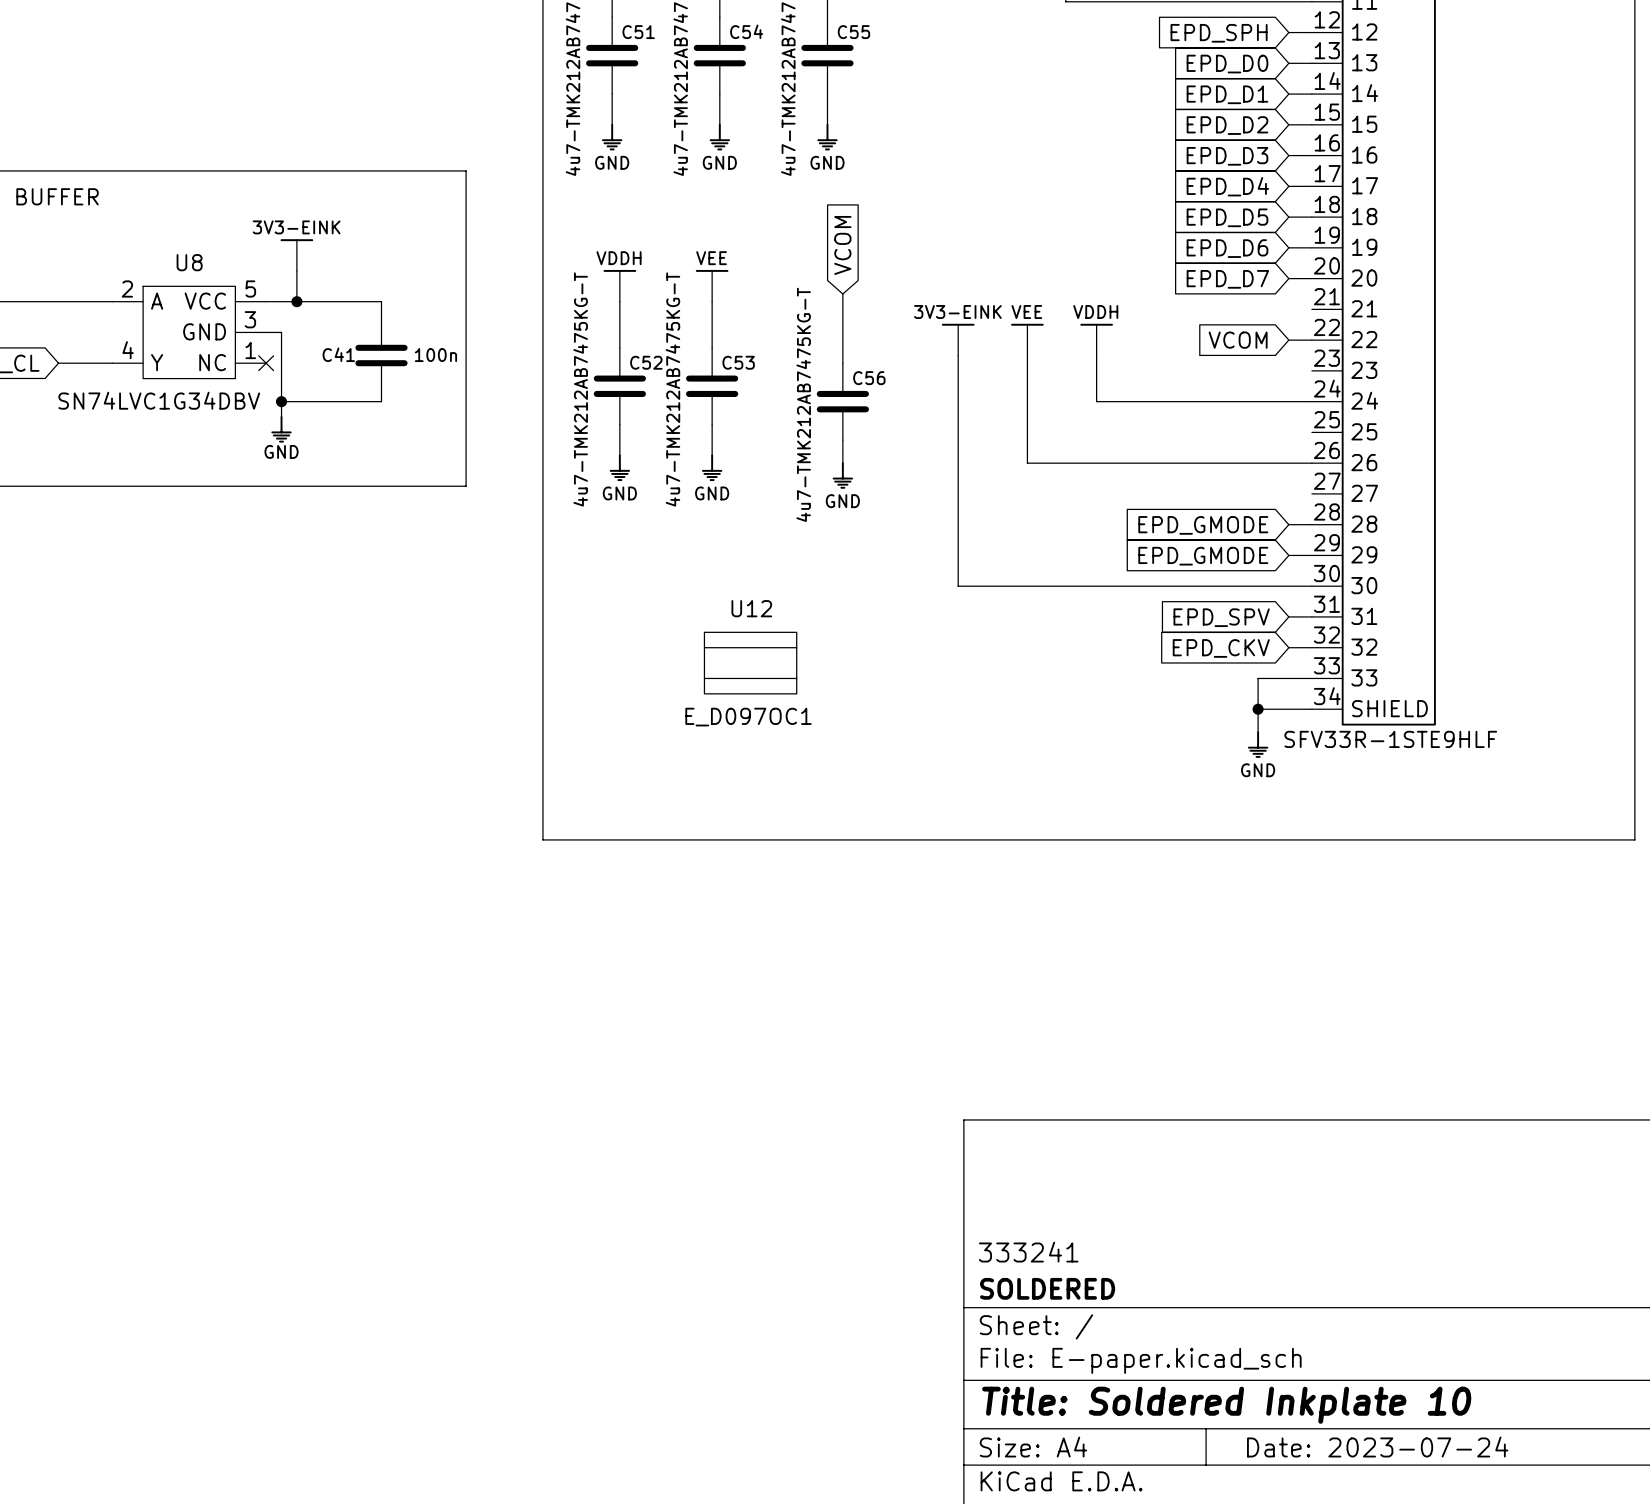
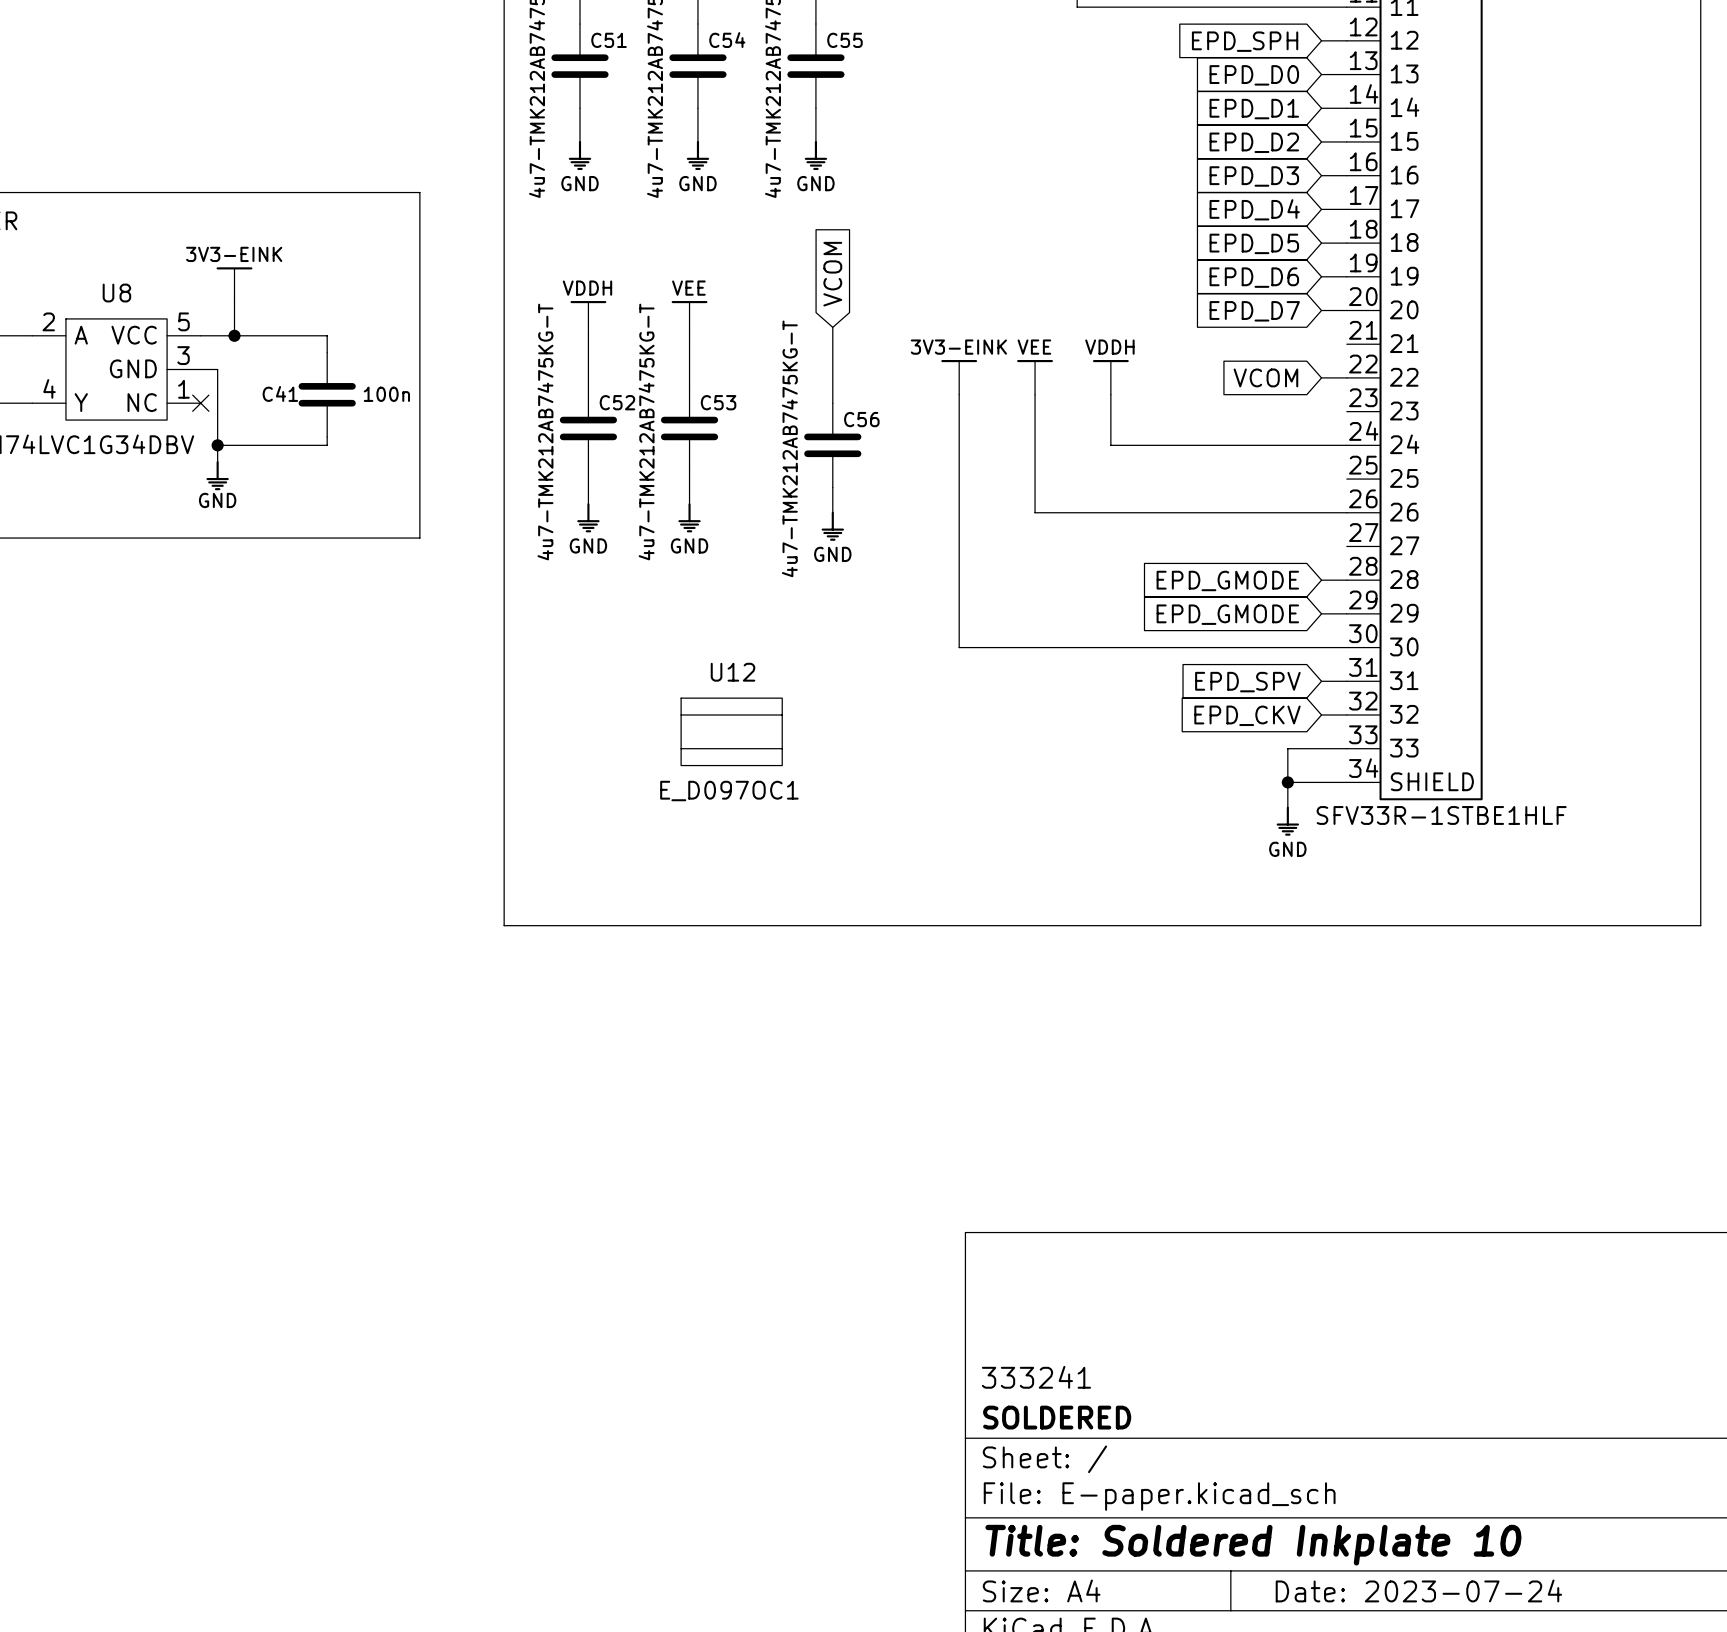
part value: SFV33R-1STE9HLF (1390, 739) -> SFV33R-1STBE1HLF (1441, 815)

